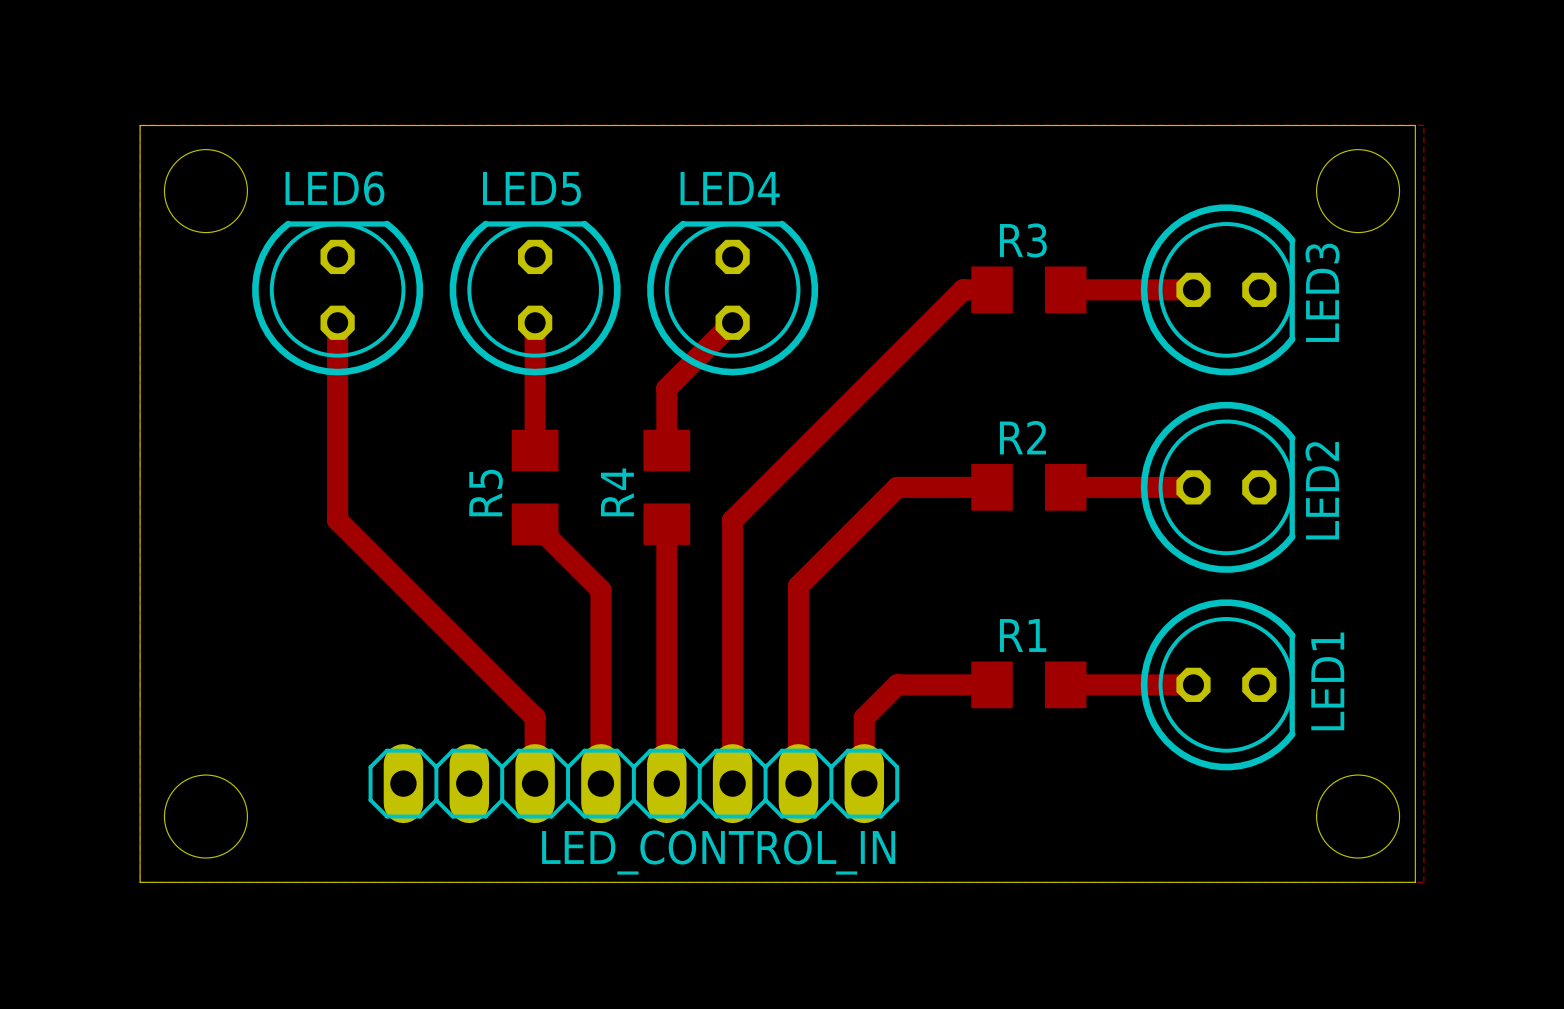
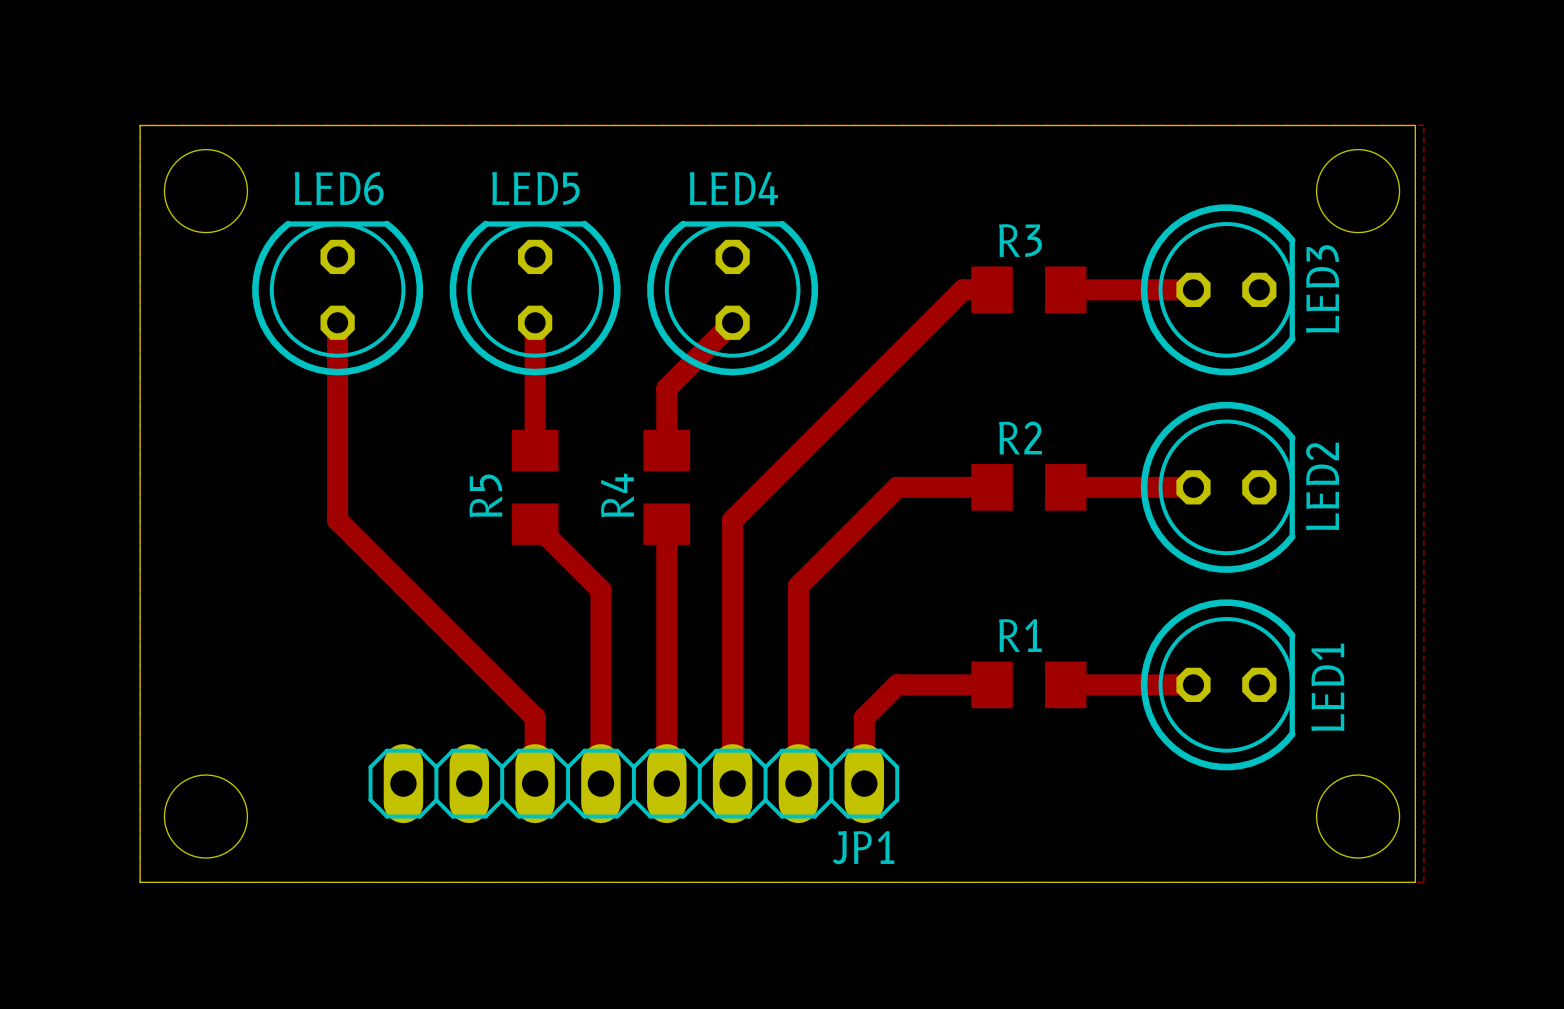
LED_CONTROL_IN name: LED_CONTROL_IN (718, 852) -> JP1 (863, 847)

